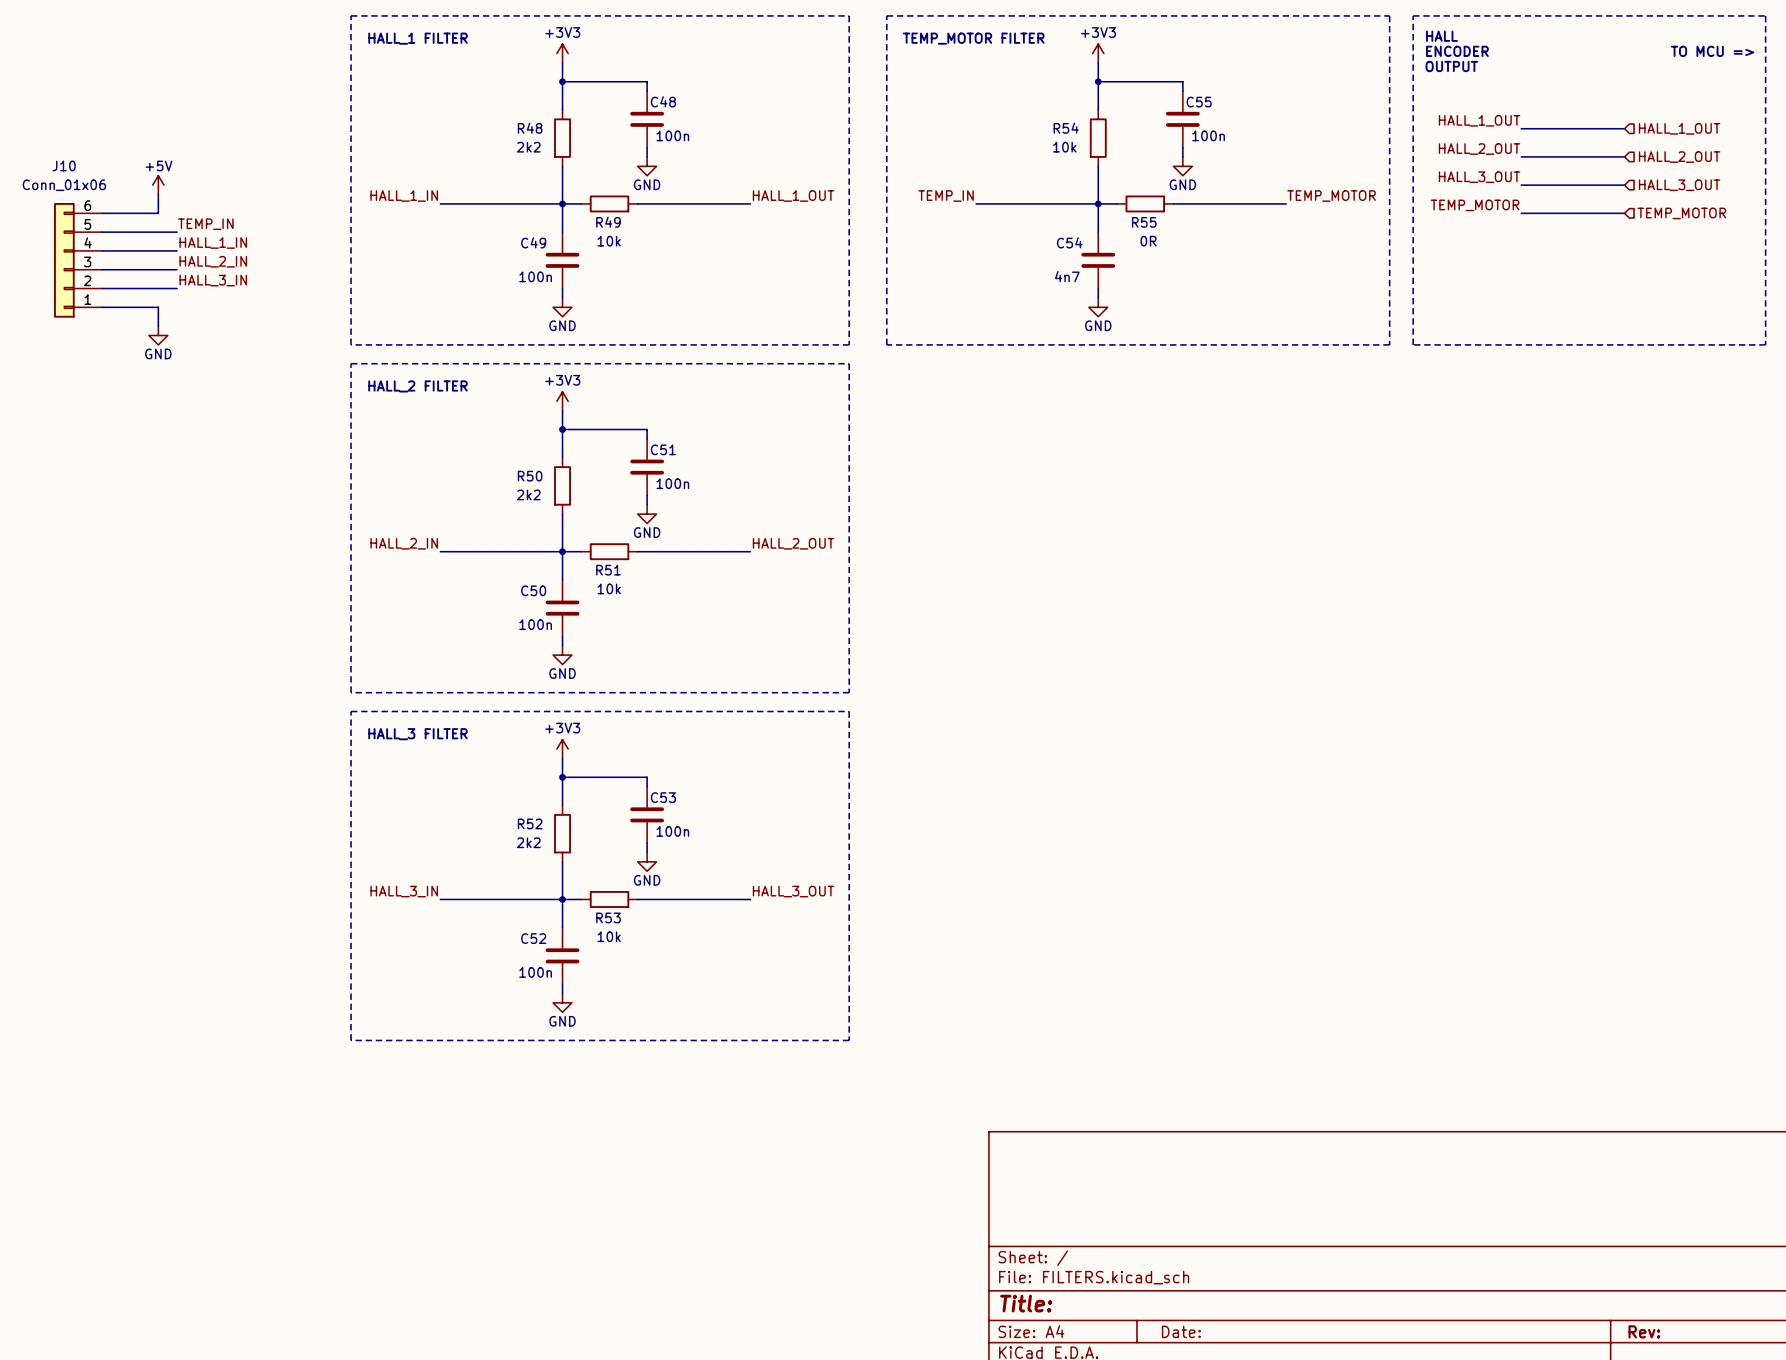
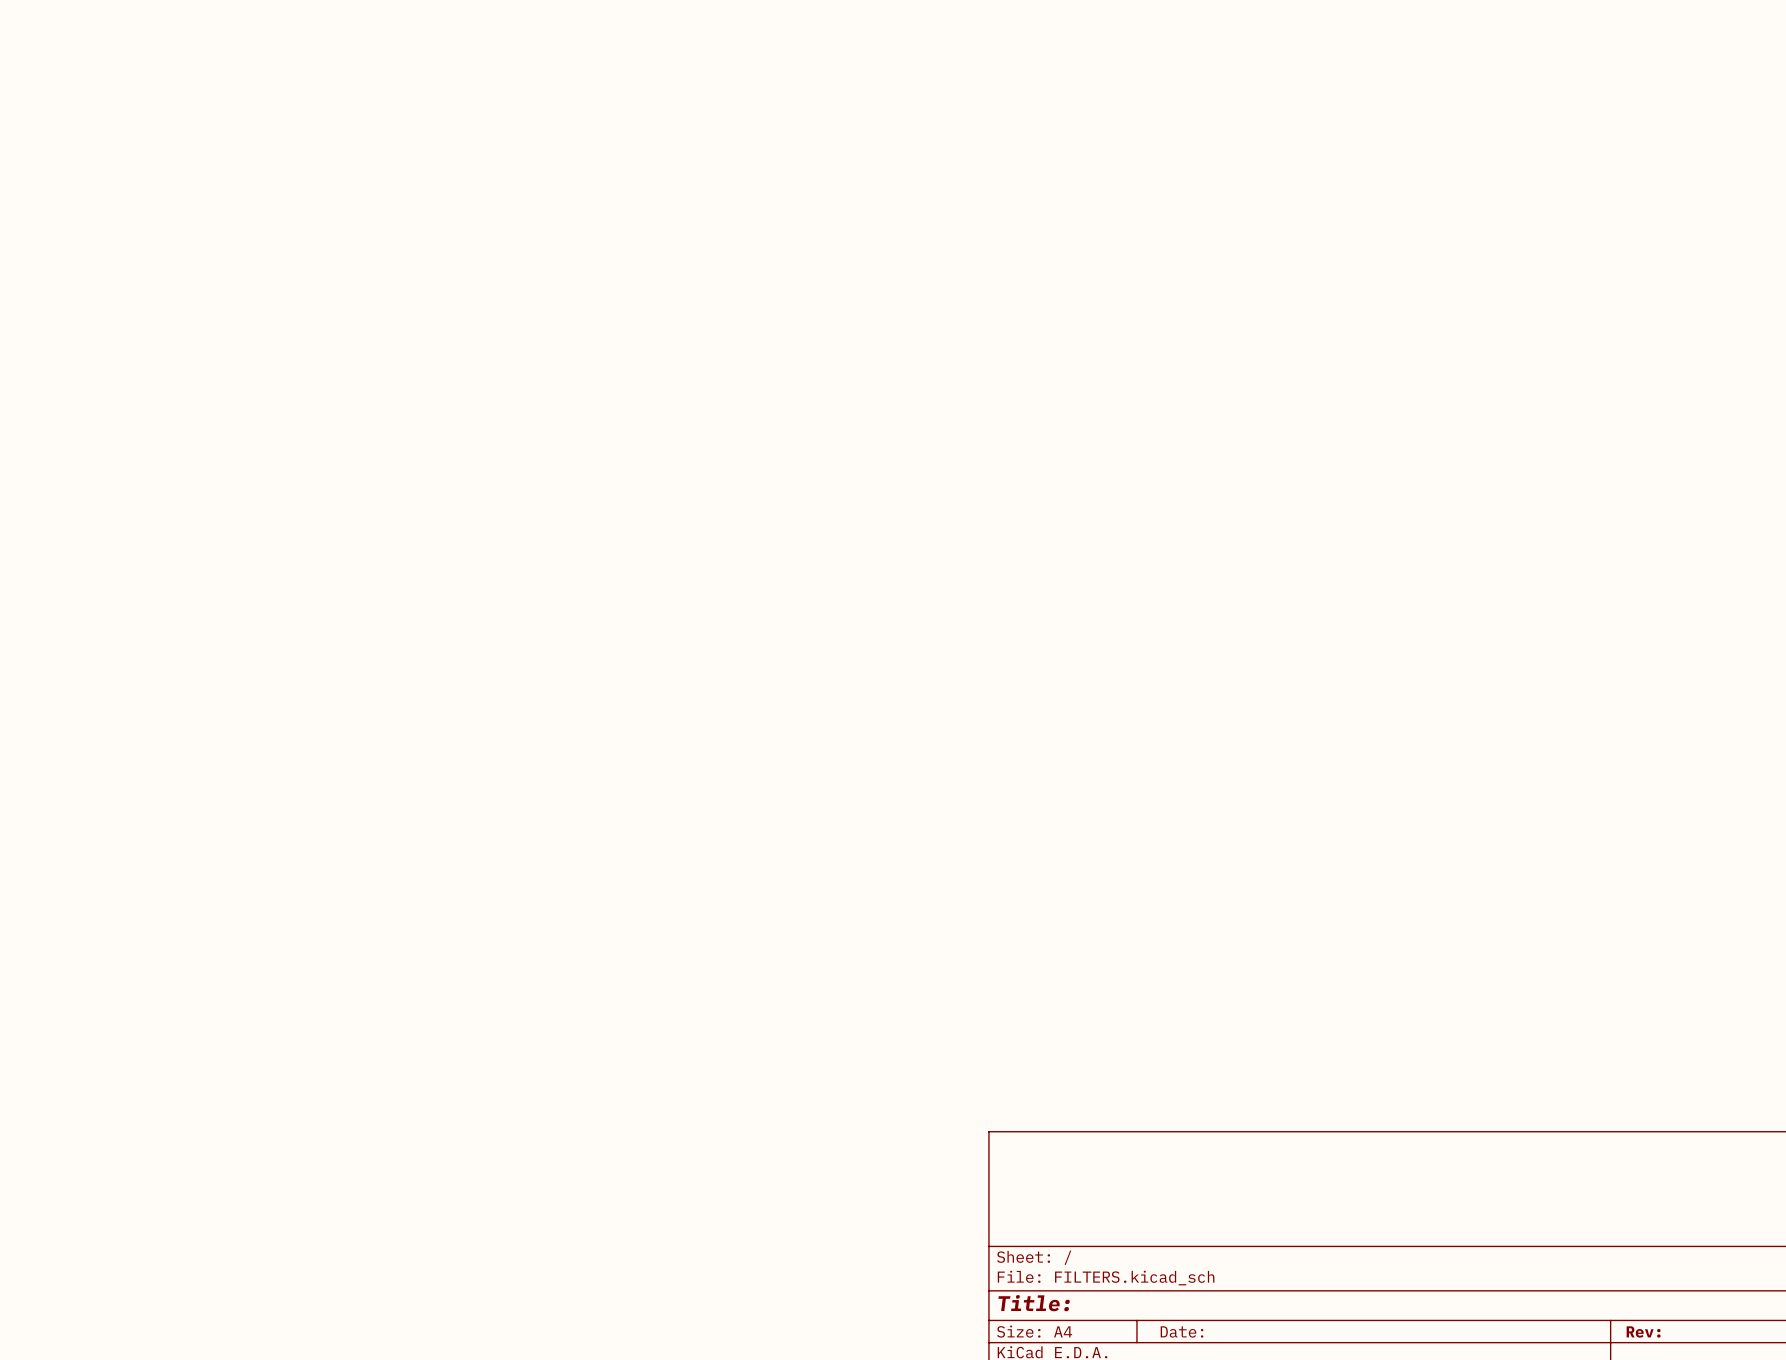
line: (351, 15) (351, 344) (849, 344) (849, 15) (351, 15) -> none
line: (886, 15) (1389, 15) (1389, 344) (886, 344) (886, 15) -> none
line: (1413, 15) (1765, 15) (1765, 344) (1413, 344) (1413, 15) -> none
text: HALL (1441, 36) -> none
text: HALL_1 FILTER (417, 38) -> none
text: TEMP_MOTOR FILTER (973, 38) -> none
text: ENCODER (1457, 51) -> none
text: TO MCU => (1712, 51) -> none
power symbol: +3V3 (562, 53) -> none
power symbol: +3V3 (1098, 53) -> none
wire: (562, 62) (562, 109) -> none
wire: (1098, 62) (1098, 109) -> none
text: OUTPUT (1451, 66) -> none
wire: (562, 81) (647, 81) (647, 91) -> none
junction: (562, 81) -> none
wire: (1098, 81) (1182, 81) (1182, 91) -> none
junction: (1098, 81) -> none
C48: 100n (647, 119) -> none
C55: 100n (1182, 119) -> none
label: HALL_1_OUT (1479, 120) -> none
wire: (1521, 128) (1624, 128) -> none
hierarchical label: HALL_1_OUT (1679, 128) -> none
R48: 2k2 (562, 138) -> none
R54: 10k (1098, 138) -> none
wire: (647, 147) (647, 156) -> none
wire: (1182, 147) (1182, 156) -> none
label: HALL_2_OUT (1479, 149) -> none
wire: (1521, 156) (1624, 156) -> none
hierarchical label: HALL_2_OUT (1679, 157) -> none
wire: (562, 166) (562, 232) -> none
power symbol: GND (647, 166) -> none
wire: (1098, 166) (1098, 232) -> none
power symbol: GND (1182, 166) -> none
label: HALL_3_OUT (1479, 177) -> none
power symbol: +5V (158, 185) -> none
wire: (1521, 185) (1624, 185) -> none
hierarchical label: HALL_3_OUT (1679, 185) -> none
wire: (158, 194) (158, 213) (101, 213) -> none
label: HALL_1_IN (404, 196) -> none
label: HALL_1_OUT (793, 196) -> none
label: TEMP_IN (946, 196) -> none
label: TEMP_MOTOR (1331, 196) -> none
wire: (440, 203) (581, 203) -> none
junction: (562, 203) -> none
R49: 10k (609, 203) -> none
wire: (637, 203) (750, 203) -> none
wire: (976, 203) (1117, 203) -> none
junction: (1098, 203) -> none
R55: 0R (1145, 203) -> none
wire: (1173, 203) (1286, 203) -> none
label: TEMP_MOTOR (1475, 205) -> none
wire: (1521, 213) (1624, 213) -> none
hierarchical label: TEMP_MOTOR (1681, 213) -> none
label: TEMP_IN (205, 224) -> none
wire: (101, 232) (177, 232) -> none
label: HALL_1_IN (213, 242) -> none
wire: (101, 250) (177, 250) -> none
J10: Conn_01x06 (77, 260) -> none
C49: 100n (562, 260) -> none
C54: 4n7 (1098, 260) -> none
label: HALL_2_IN (213, 261) -> none
wire: (101, 269) (177, 269) -> none
label: HALL_3_IN (213, 280) -> none
wire: (101, 288) (177, 288) -> none
wire: (562, 288) (562, 297) -> none
wire: (1098, 288) (1098, 297) -> none
wire: (101, 307) (158, 307) (158, 326) -> none
power symbol: GND (562, 307) -> none
power symbol: GND (1098, 307) -> none
power symbol: GND (158, 335) -> none
line: (351, 363) (849, 363) (849, 692) (351, 692) (351, 363) -> none
text: HALL_2 FILTER (417, 386) -> none
power symbol: +3V3 (562, 401) -> none
wire: (562, 410) (562, 457) -> none
wire: (562, 429) (647, 429) (647, 438) -> none
junction: (562, 429) -> none
C51: 100n (647, 467) -> none
R50: 2k2 (562, 485) -> none
wire: (647, 495) (647, 504) -> none
wire: (562, 514) (562, 579) -> none
power symbol: GND (647, 514) -> none
label: HALL_2_IN (404, 543) -> none
label: HALL_2_OUT (793, 543) -> none
wire: (440, 551) (581, 551) -> none
junction: (562, 551) -> none
R51: 10k (609, 551) -> none
wire: (637, 551) (750, 551) -> none
C50: 100n (562, 608) -> none
wire: (562, 636) (562, 645) -> none
power symbol: GND (562, 655) -> none
line: (351, 711) (351, 1040) (849, 1040) (849, 711) (351, 711) -> none
text: HALL_3 FILTER (417, 734) -> none
power symbol: +3V3 (562, 749) -> none
wire: (562, 758) (562, 805) -> none
wire: (562, 777) (647, 777) (647, 786) -> none
junction: (562, 777) -> none
C53: 100n (647, 814) -> none
R52: 2k2 (562, 833) -> none
wire: (647, 843) (647, 852) -> none
wire: (562, 861) (562, 927) -> none
power symbol: GND (647, 861) -> none
label: HALL_3_IN (404, 891) -> none
label: HALL_3_OUT (793, 891) -> none
wire: (440, 899) (581, 899) -> none
junction: (562, 899) -> none
R53: 10k (609, 899) -> none
wire: (637, 899) (750, 899) -> none
C52: 100n (562, 955) -> none
wire: (562, 984) (562, 993) -> none
power symbol: GND (562, 1002) -> none

